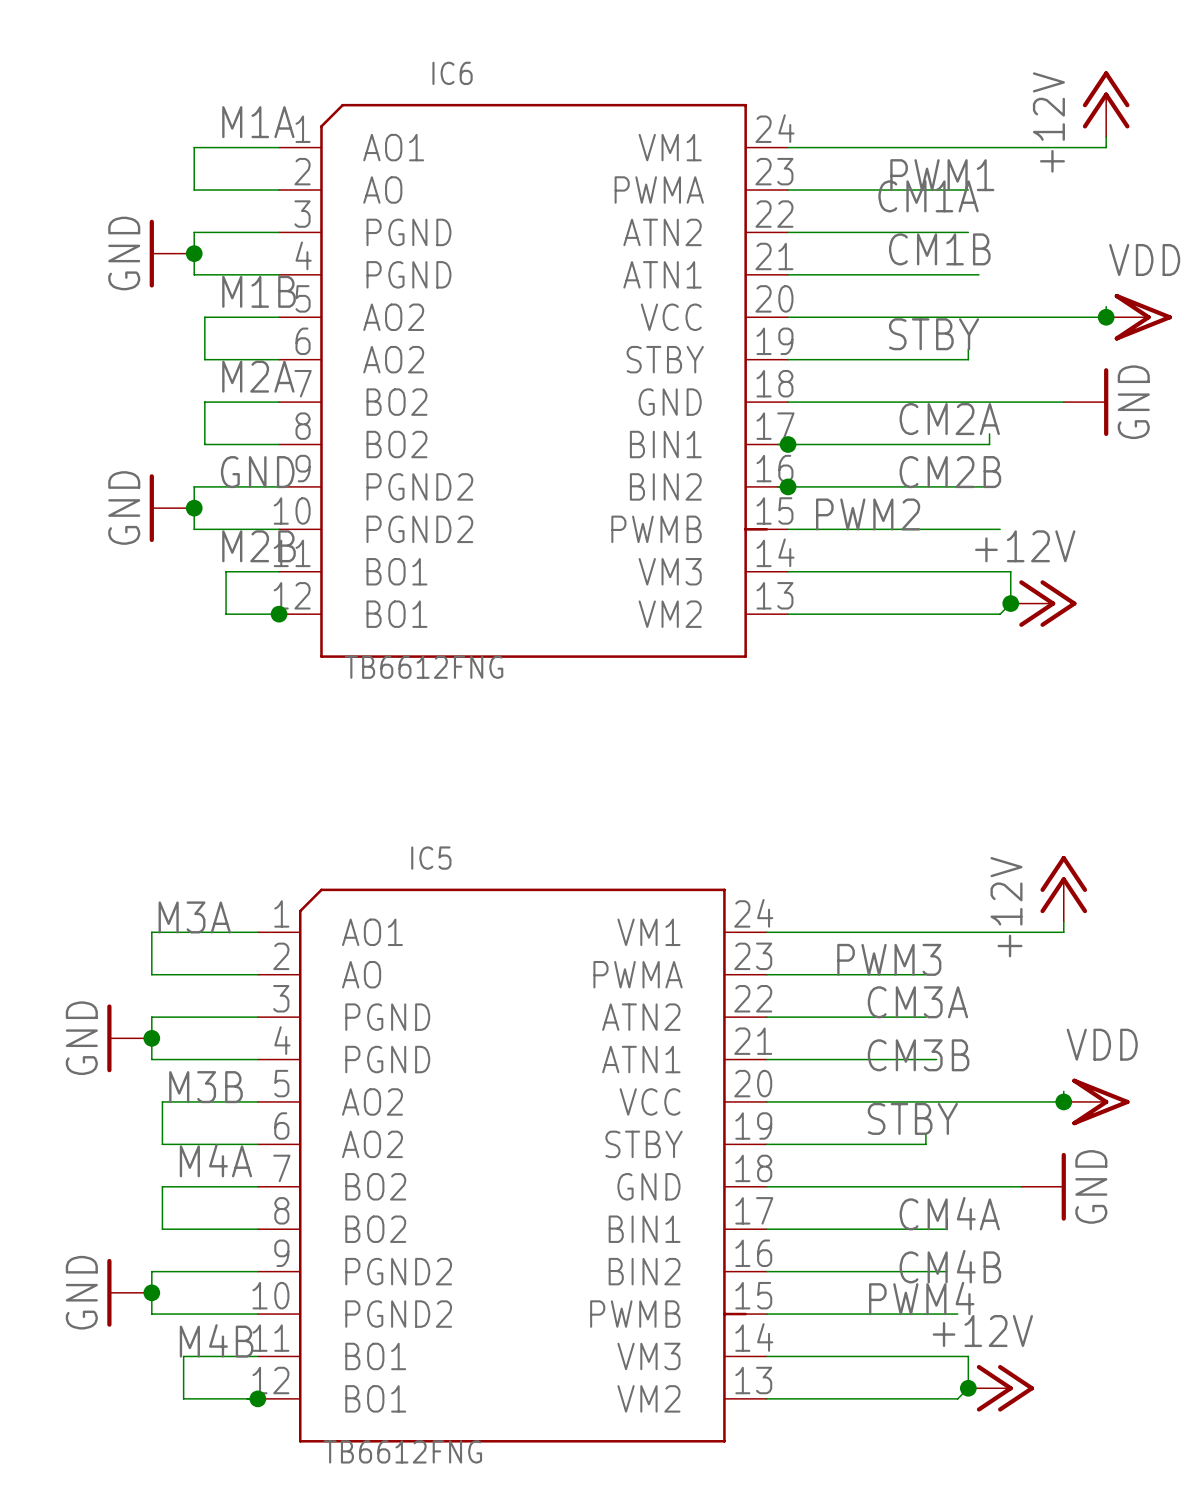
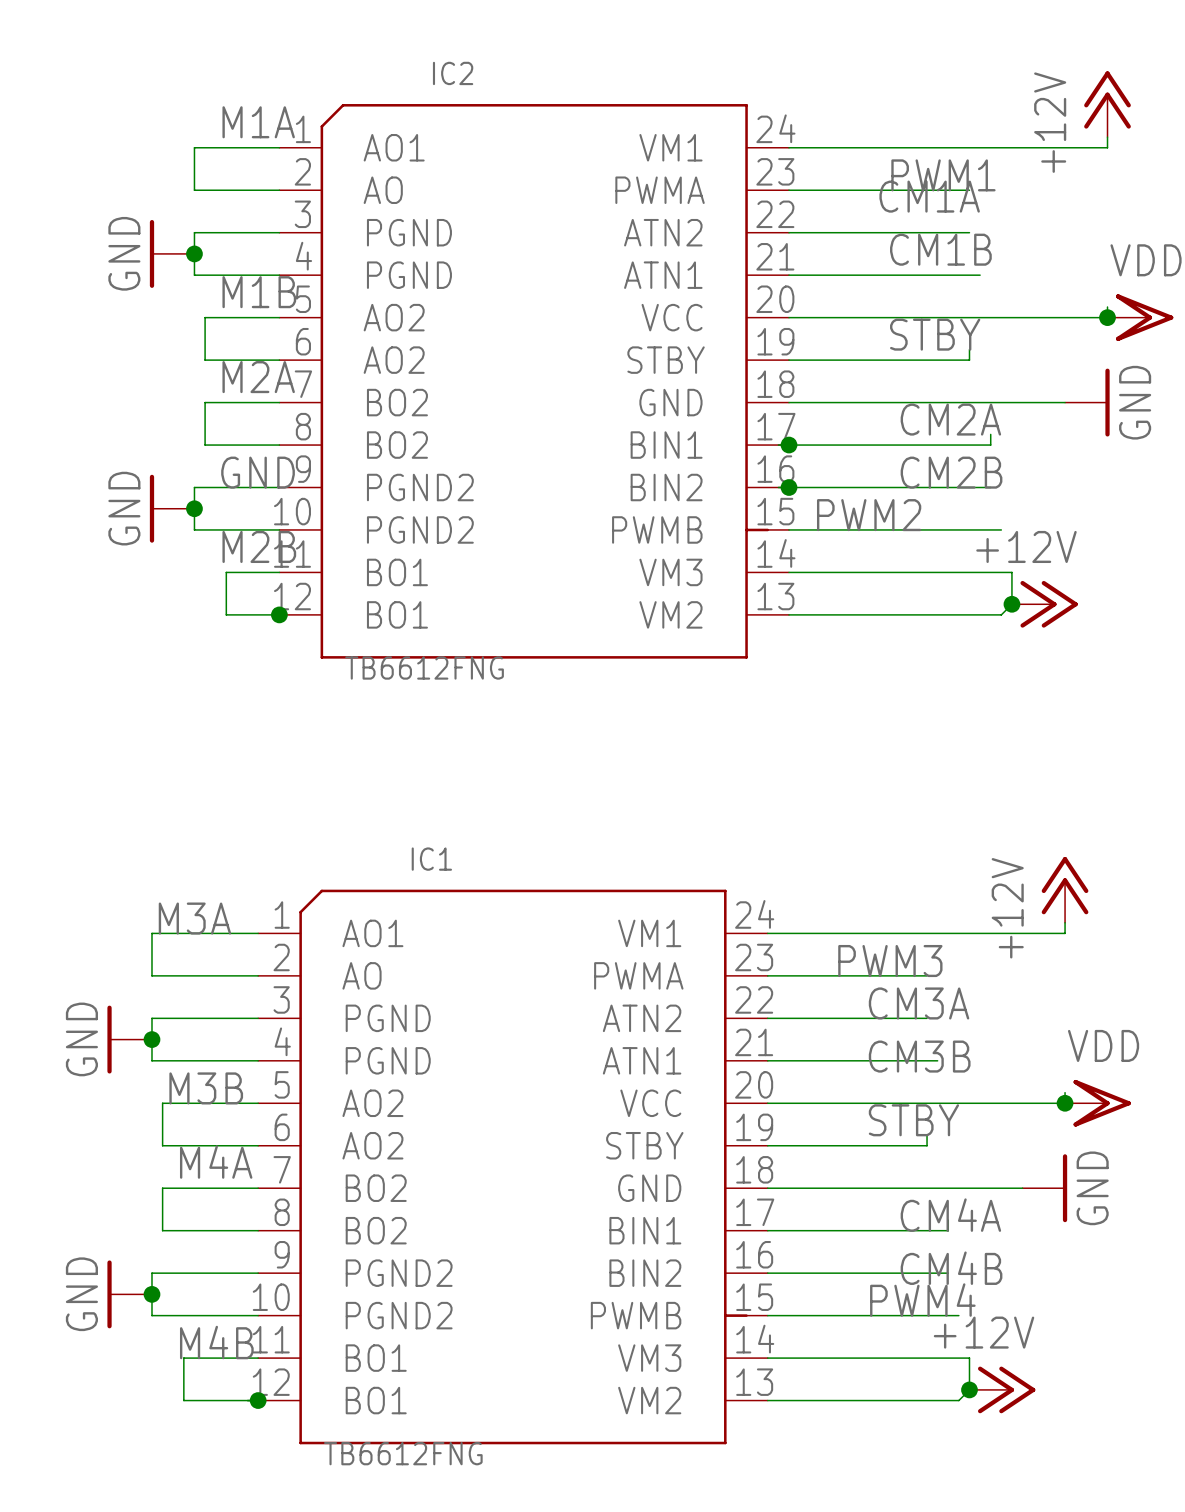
IC6 name: IC6 (452, 73) -> IC2 (453, 73)
IC5 name: IC5 (431, 858) -> IC1 (431, 859)

